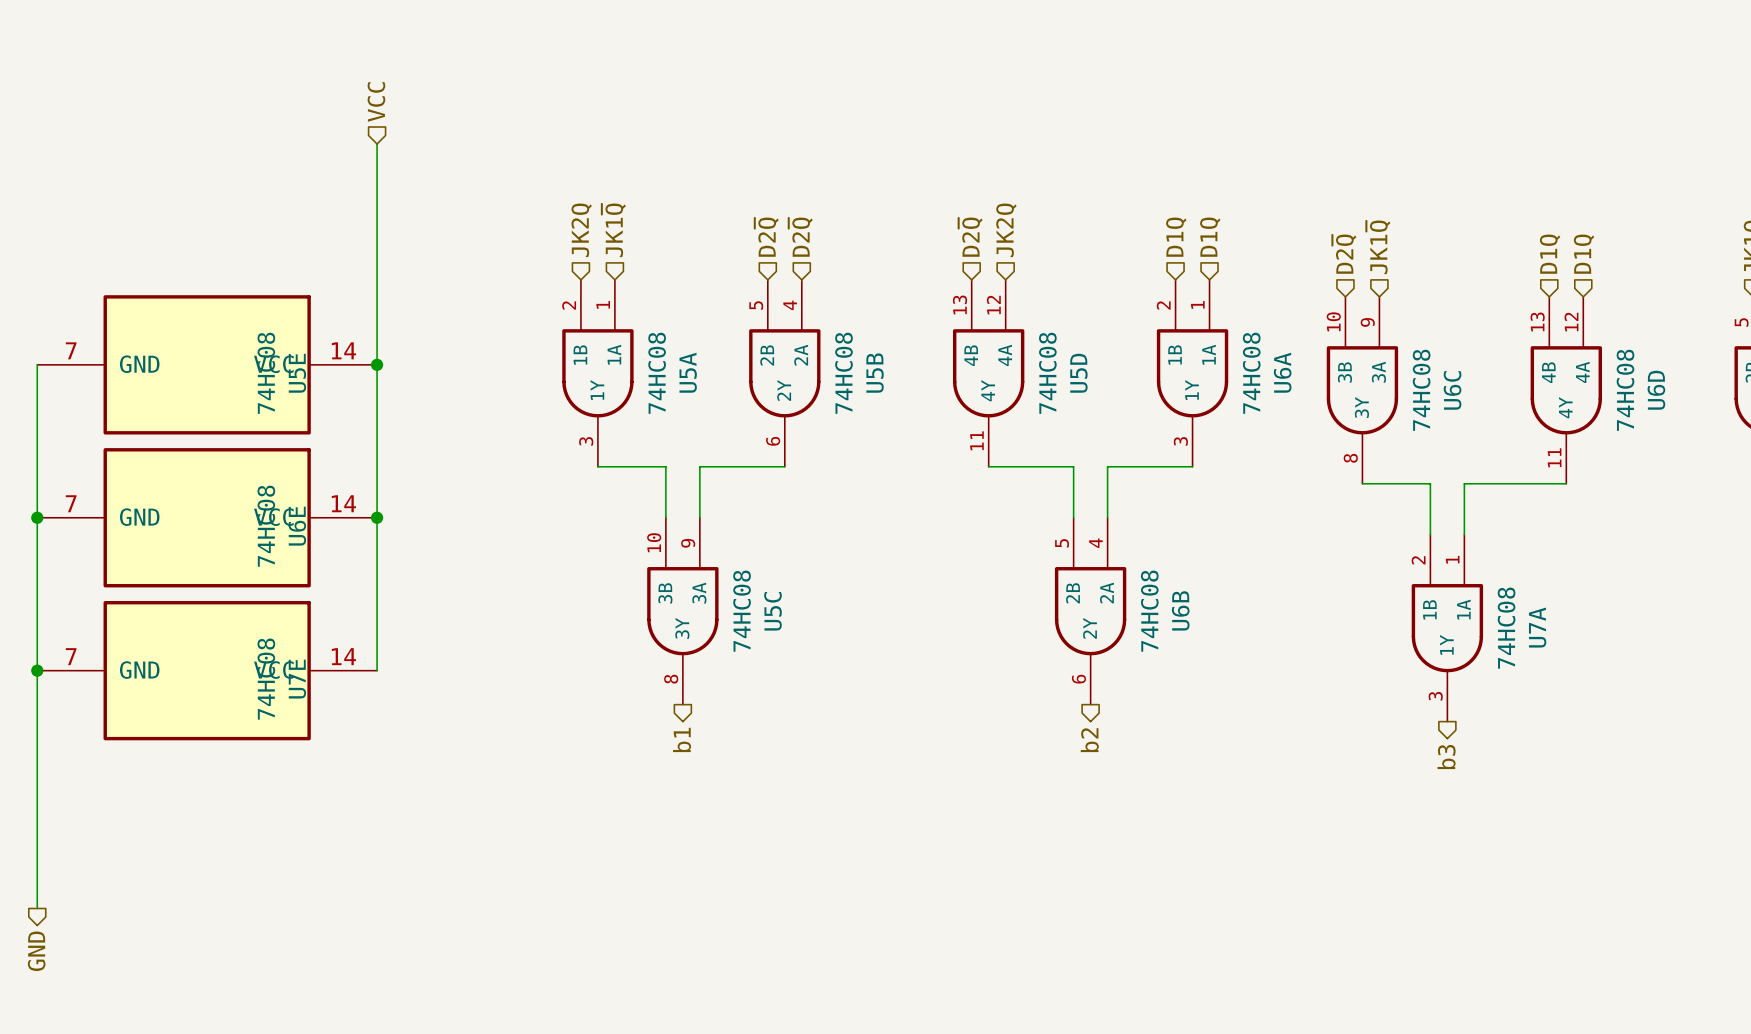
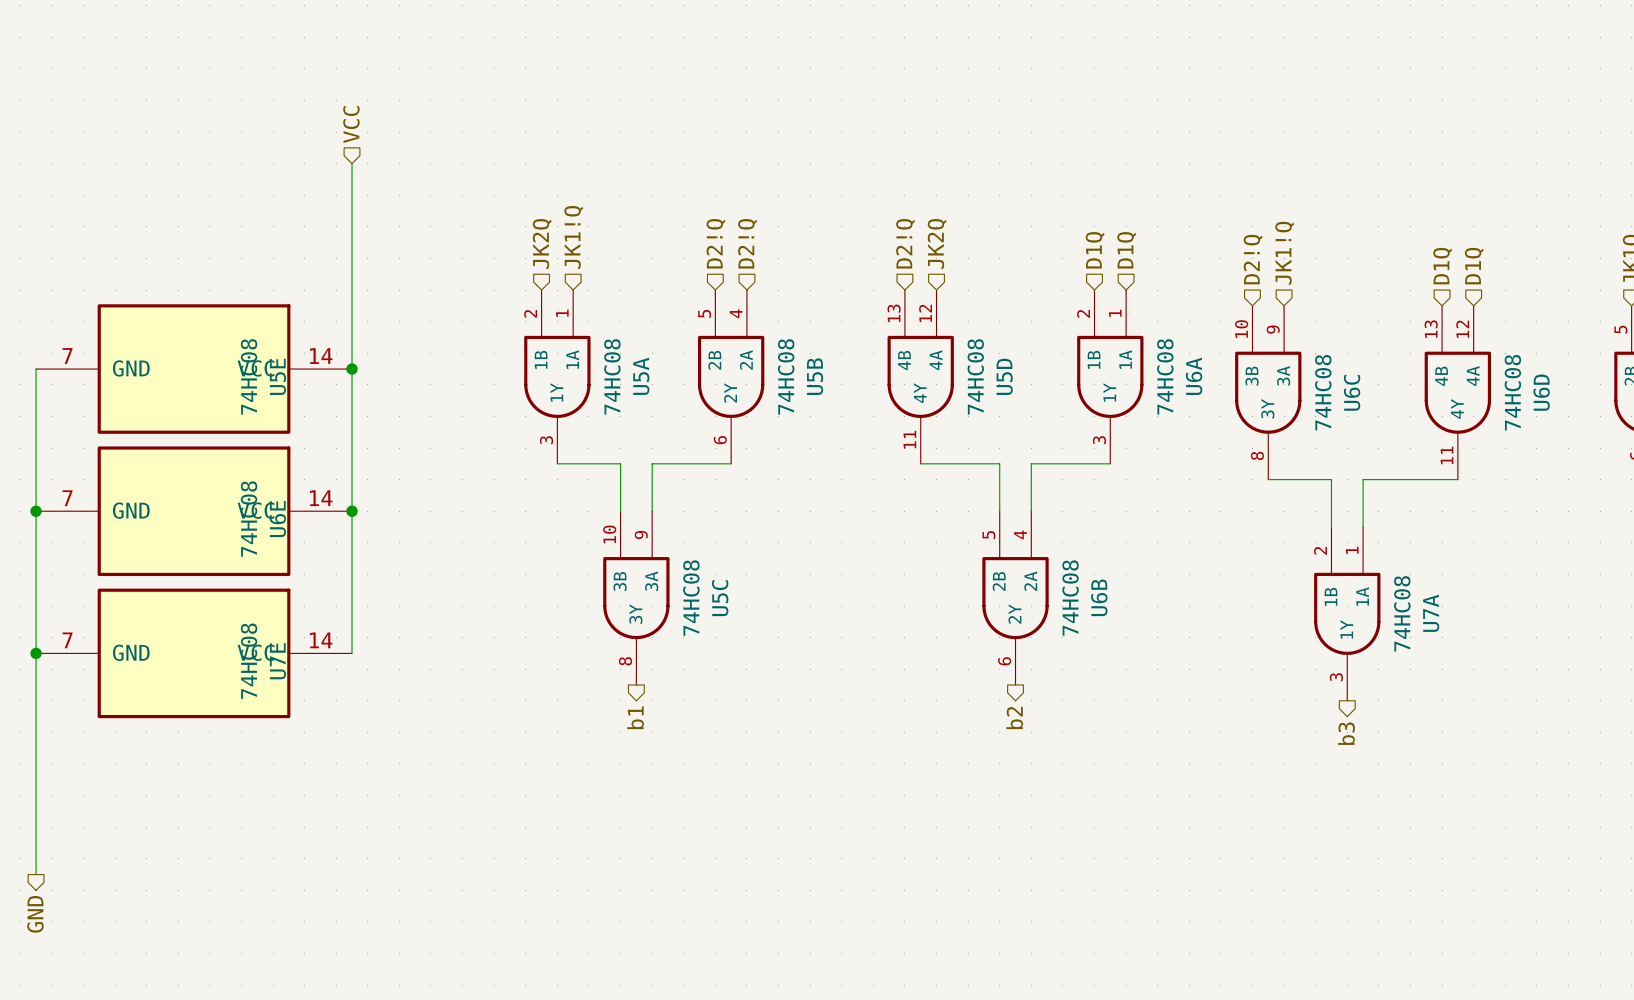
hierarchical label: JK1~{Q} (613, 230) -> JK1!Q (573, 237)
hierarchical label: D2~{Q} (766, 237) -> D2!Q (716, 243)
hierarchical label: D2~{Q} (800, 237) -> D2!Q (747, 243)
hierarchical label: D2~{Q} (970, 237) -> D2!Q (905, 243)
hierarchical label: JK1~{Q} (1378, 247) -> JK1!Q (1284, 253)
hierarchical label: D2~{Q} (1344, 254) -> D2!Q (1253, 259)

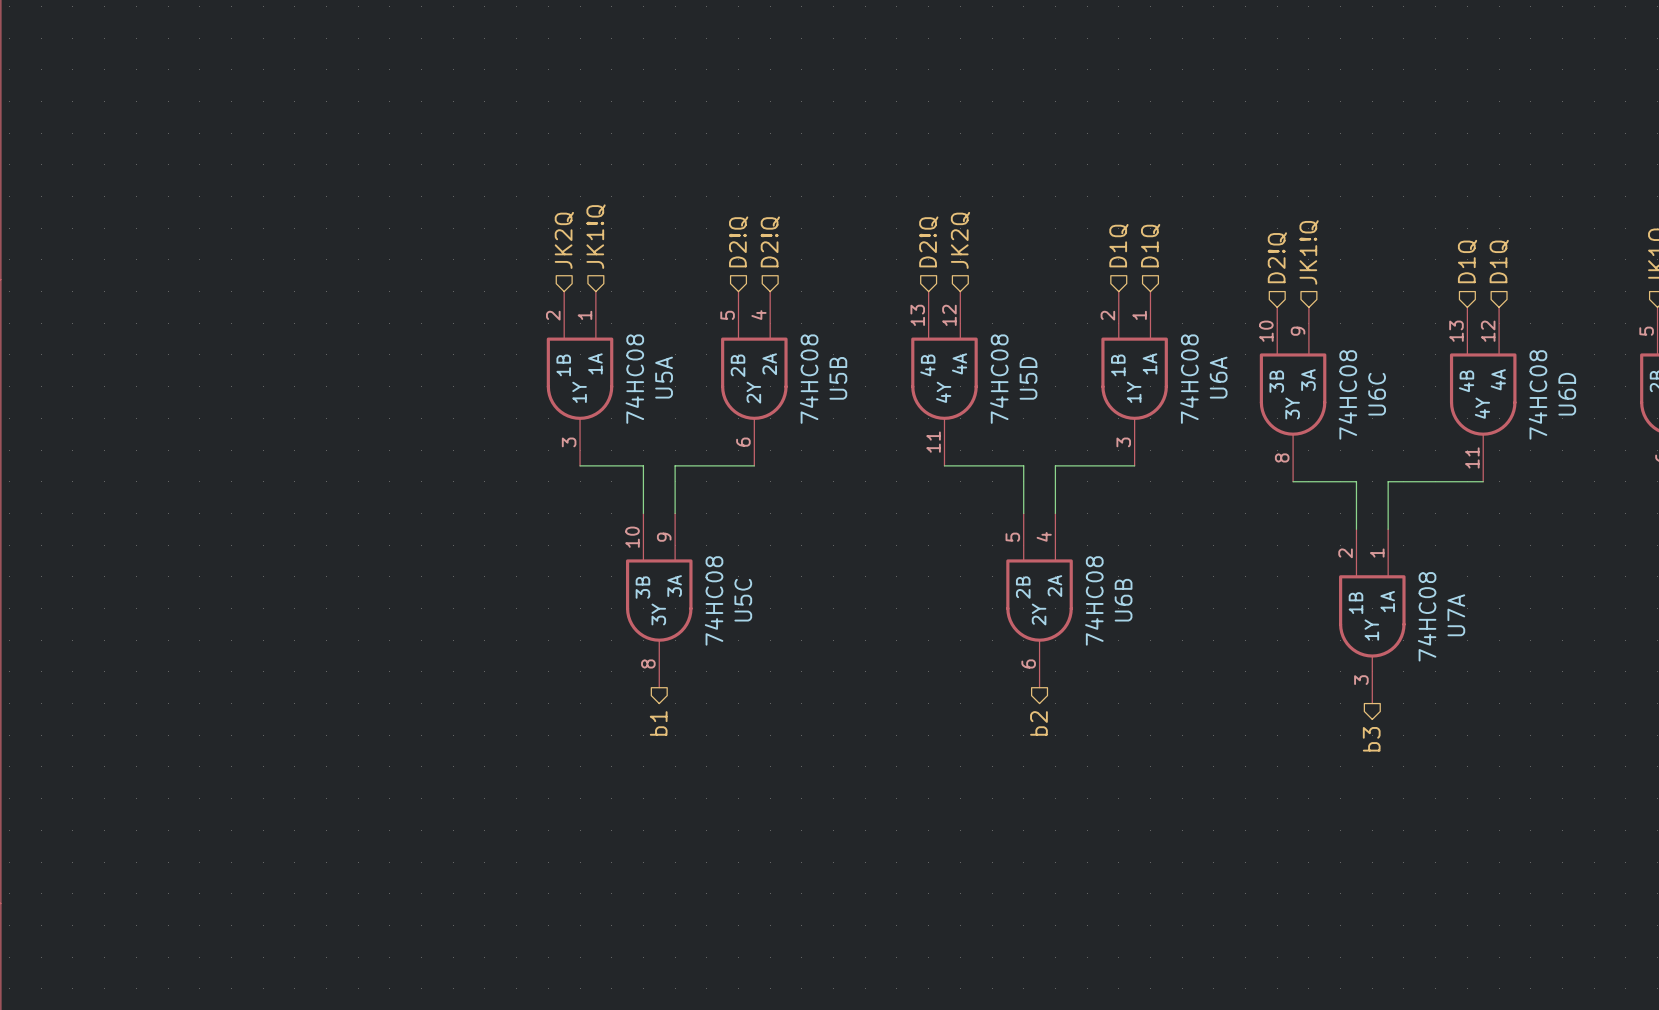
hierarchical label: VCC (351, 124) -> none
wire: (352, 163) (352, 653) -> none
wire: (36, 369) (36, 874) -> none
U5E: 74HC08 (194, 369) -> none
junction: (352, 369) -> none
junction: (36, 511) -> none
U6E: 74HC08 (194, 511) -> none
junction: (352, 511) -> none
junction: (36, 653) -> none
U7E: 74HC08 (194, 653) -> none
hierarchical label: GND (35, 914) -> none

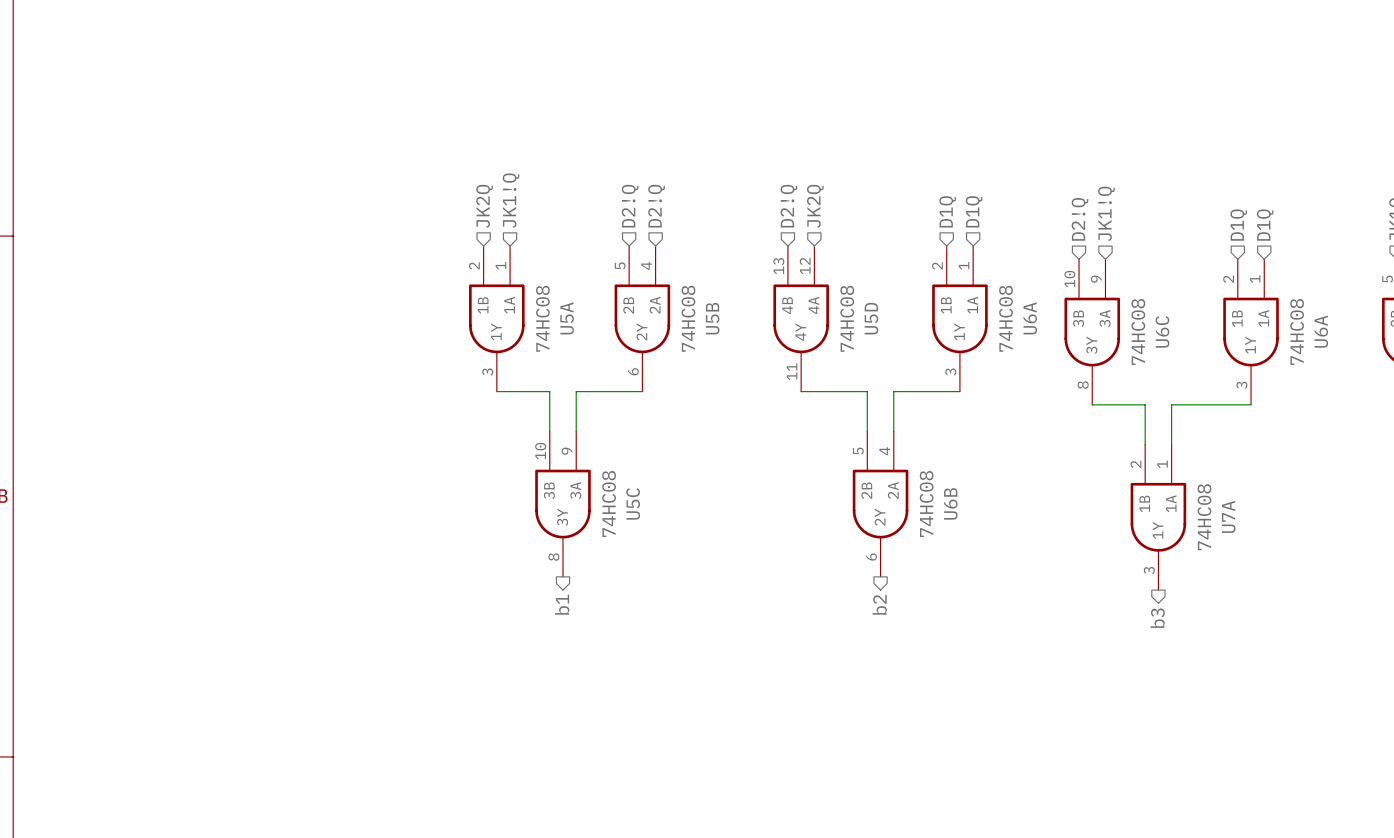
U6D pin number: 13 (1456, 331) -> 2 (1228, 279)
U6D pin number: 12 (1488, 331) -> 1 (1255, 279)
U6D pin name: 4A (1498, 379) -> 1A (1263, 318)
U6D pin name: 4B (1466, 381) -> 1B (1237, 318)
U6D name: U6D (1567, 394) -> U6A (1321, 331)
U6D pin name: 4Y (1482, 408) -> 1Y (1250, 345)
U6D pin number: 11 (1472, 457) -> 3 (1241, 385)

